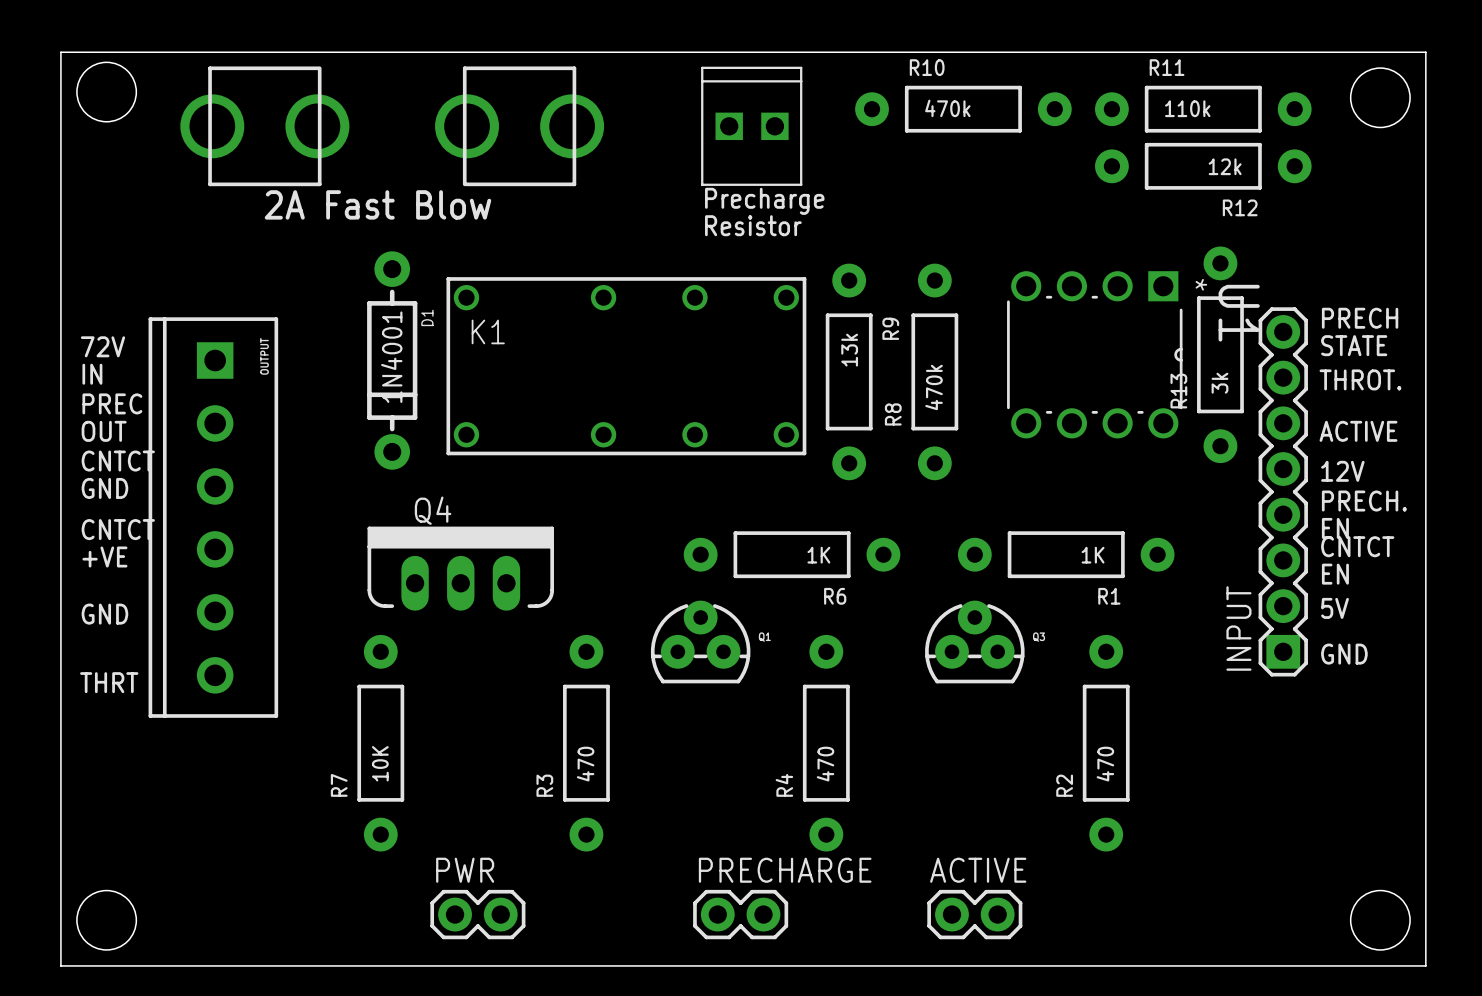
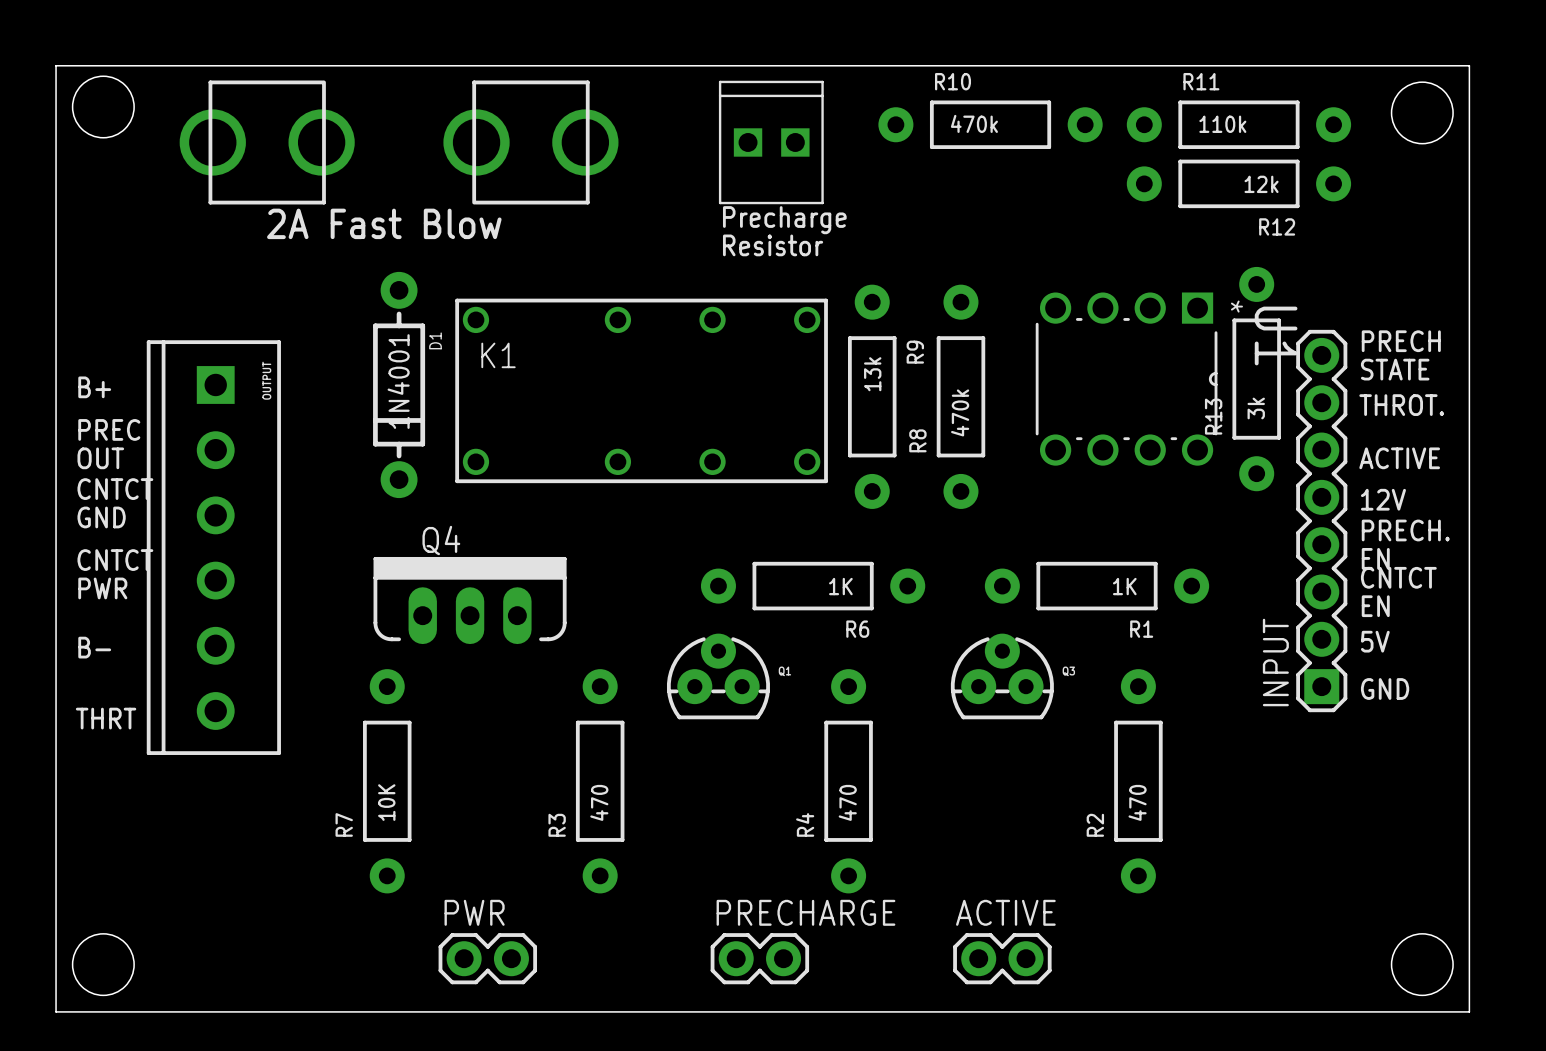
text: 72V (102, 346) -> none
text: none -> B+ (94, 387)
text: IN (92, 374) -> none
text: +VE (104, 556) -> PWR (102, 588)
text: GND (104, 614) -> B- (94, 647)

